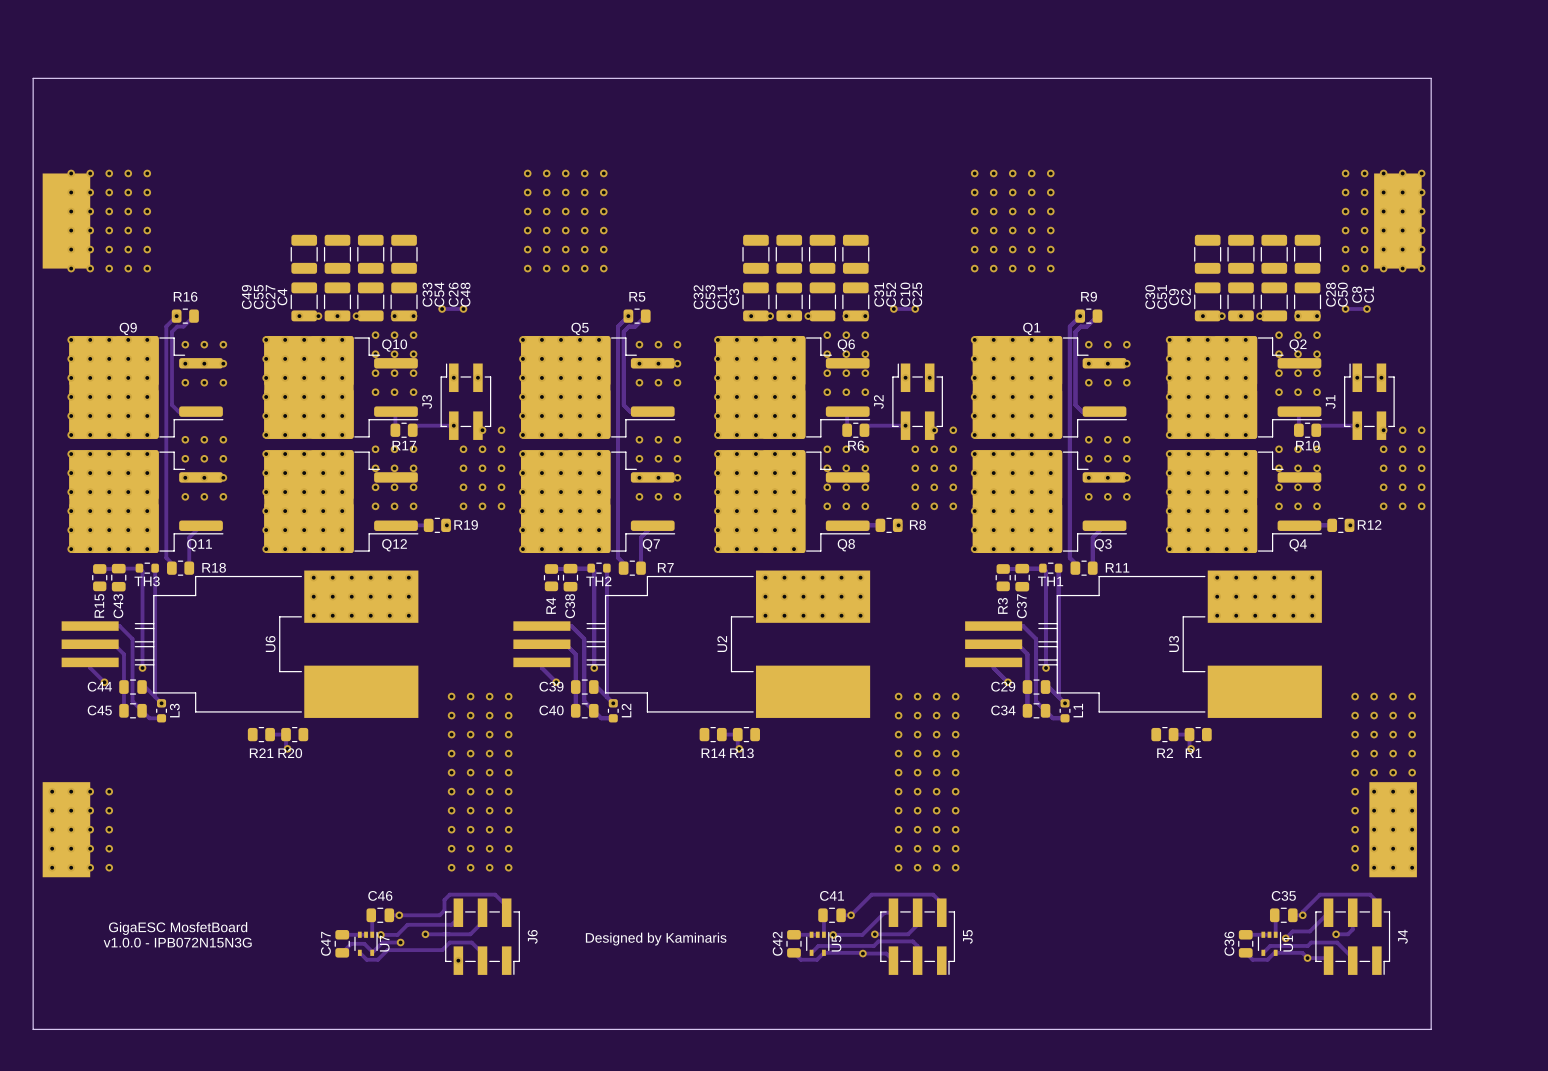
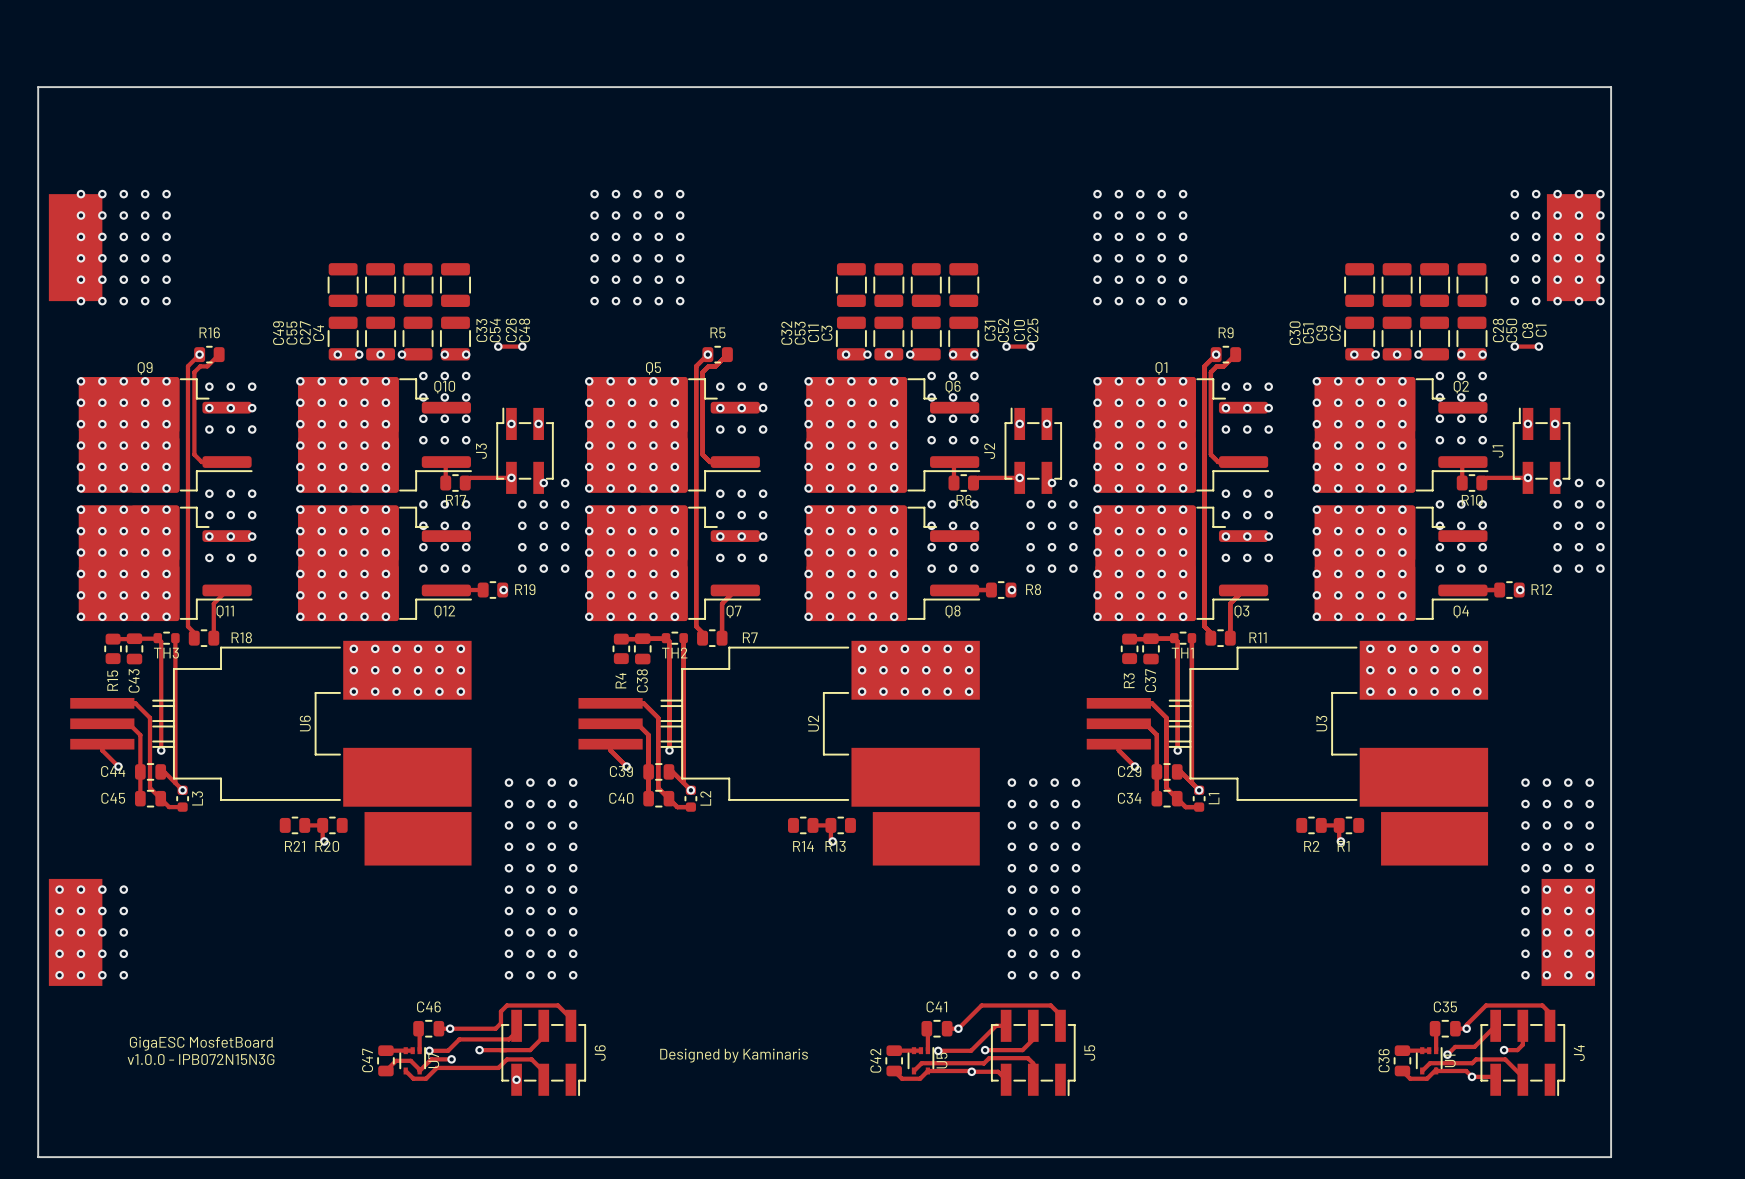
part: none -> (418, 838)
part: none -> (926, 838)
part: none -> (1434, 838)

